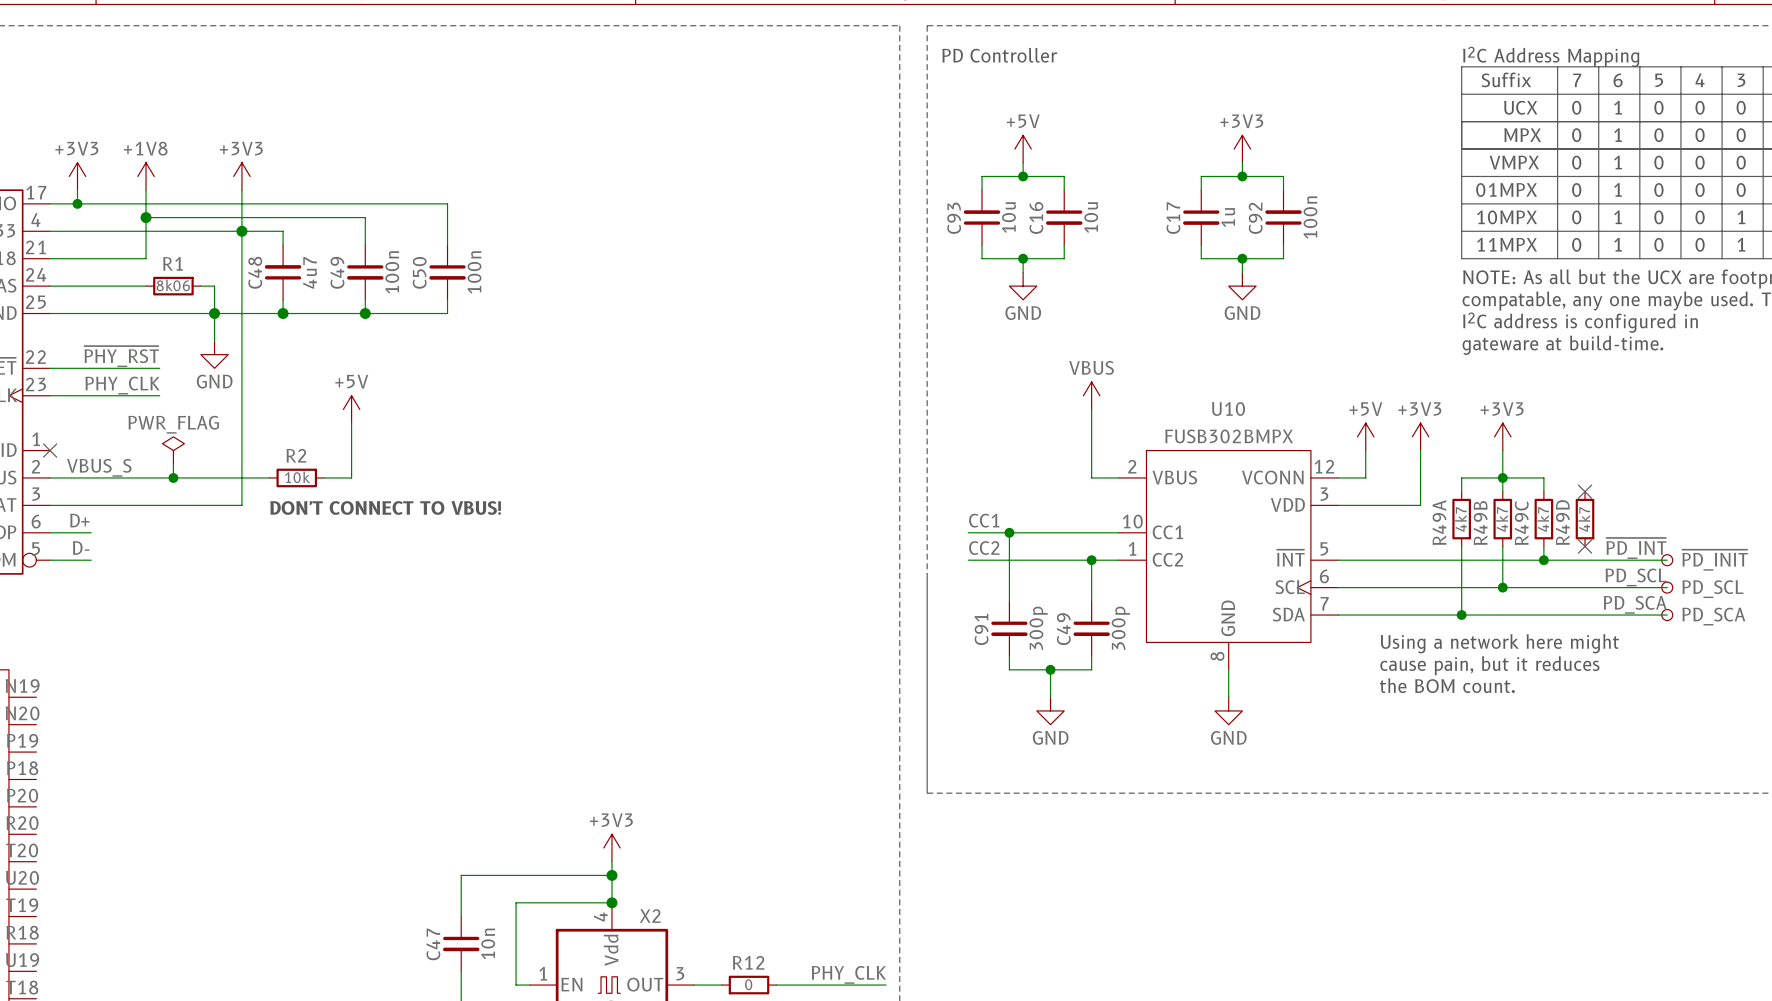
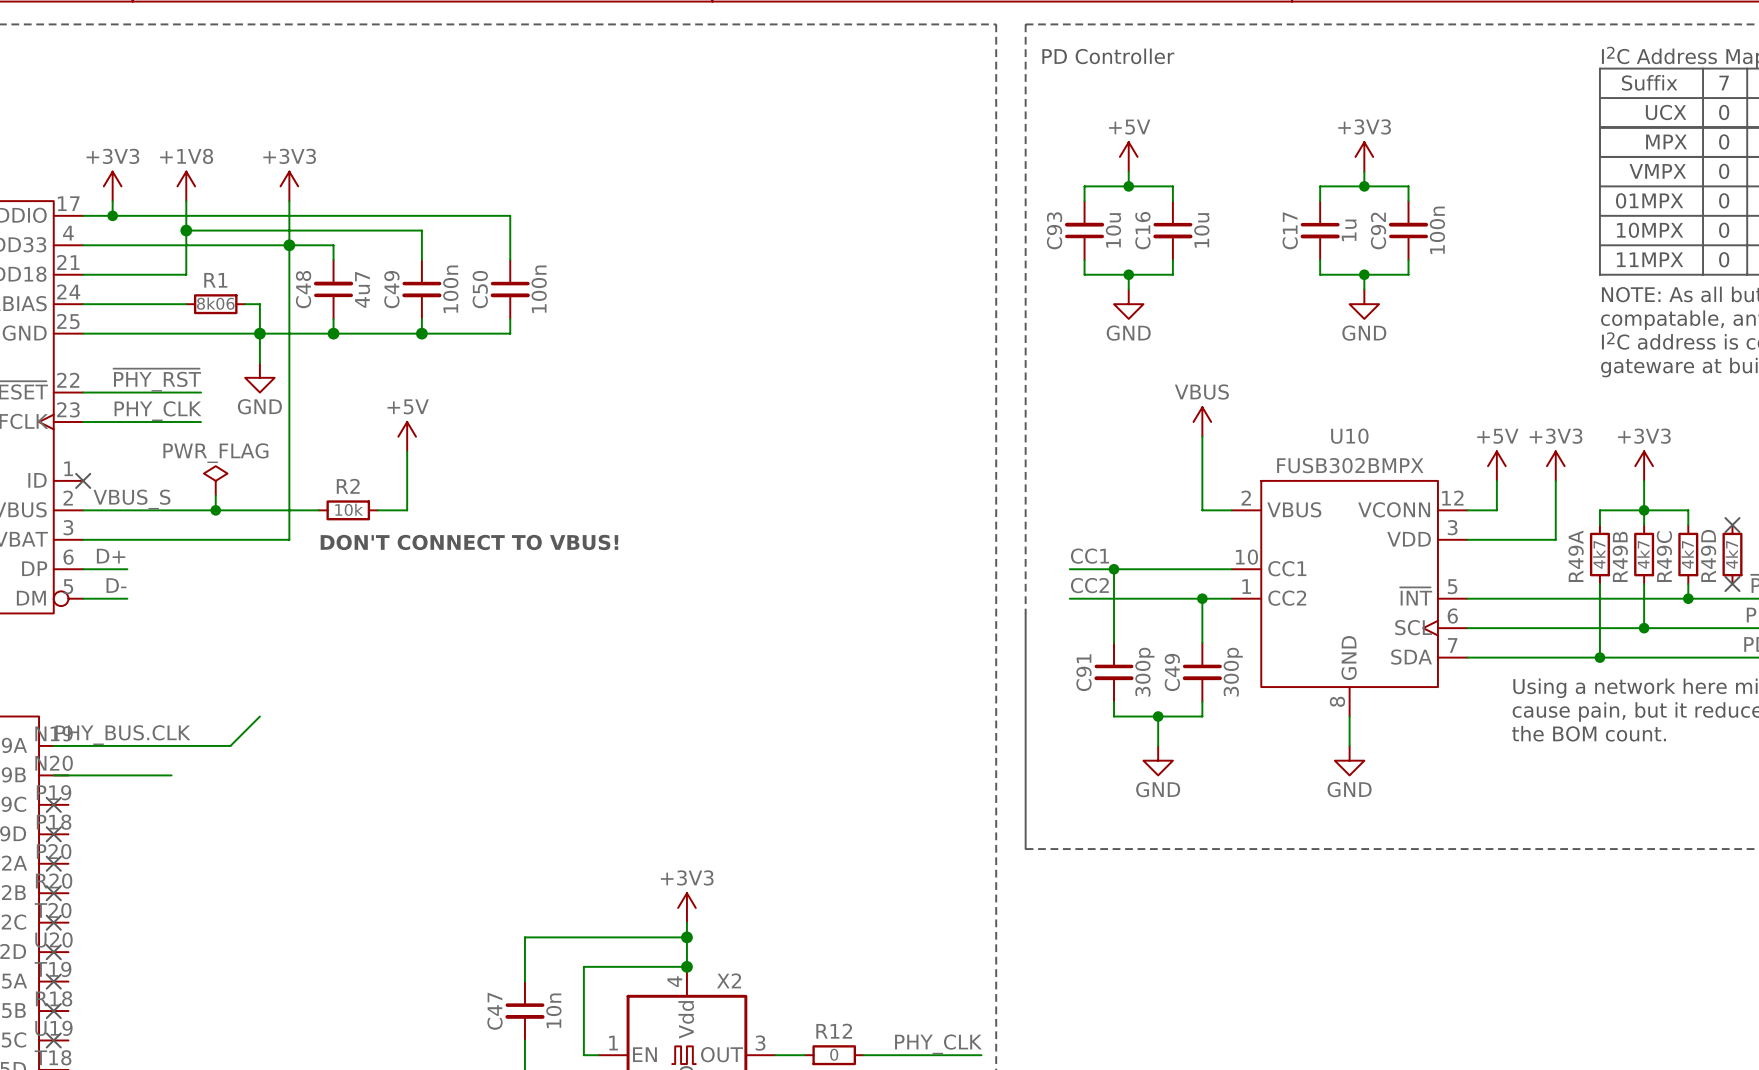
wire: none -> (259, 716) (230, 745) (53, 745)
label: none -> PHY_BUS.CLK (123, 735)
wire: none -> (53, 775) (171, 775)
no-connect mark: none -> (53, 804)
no-connect mark: none -> (53, 834)
no-connect mark: none -> (53, 863)
no-connect mark: none -> (53, 893)
no-connect mark: none -> (53, 922)
no-connect mark: none -> (53, 952)
no-connect mark: none -> (53, 981)
no-connect mark: none -> (53, 1011)
no-connect mark: none -> (53, 1040)

